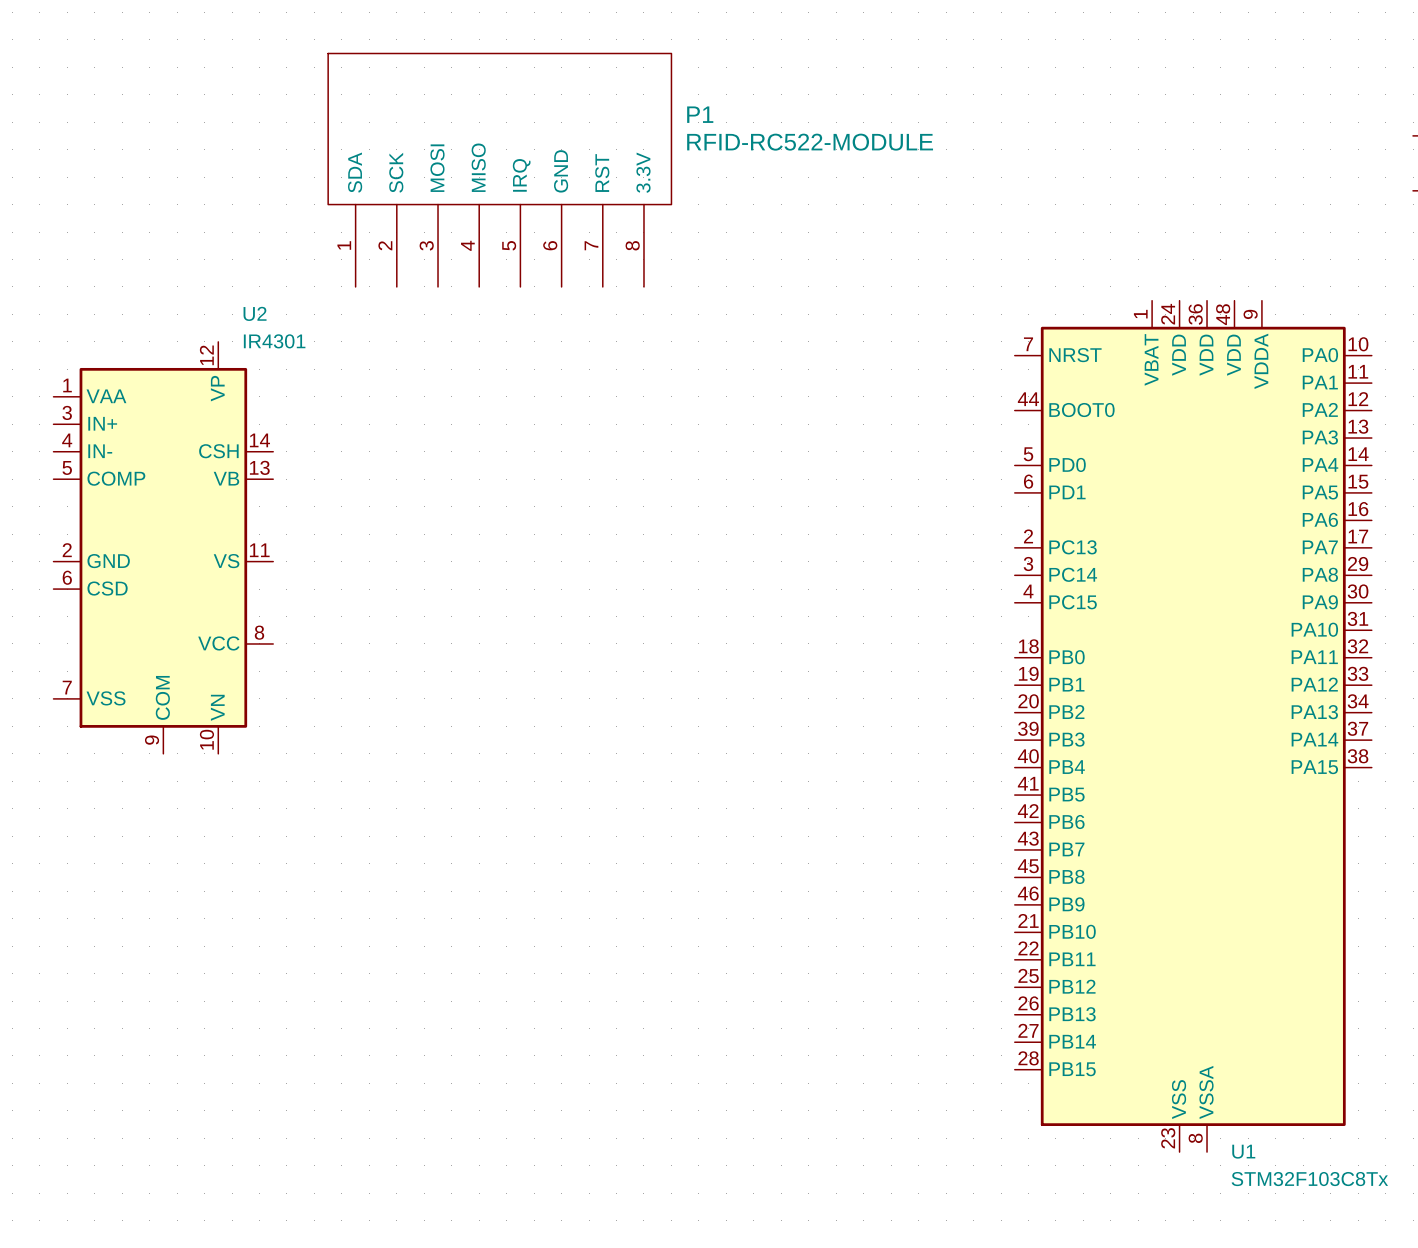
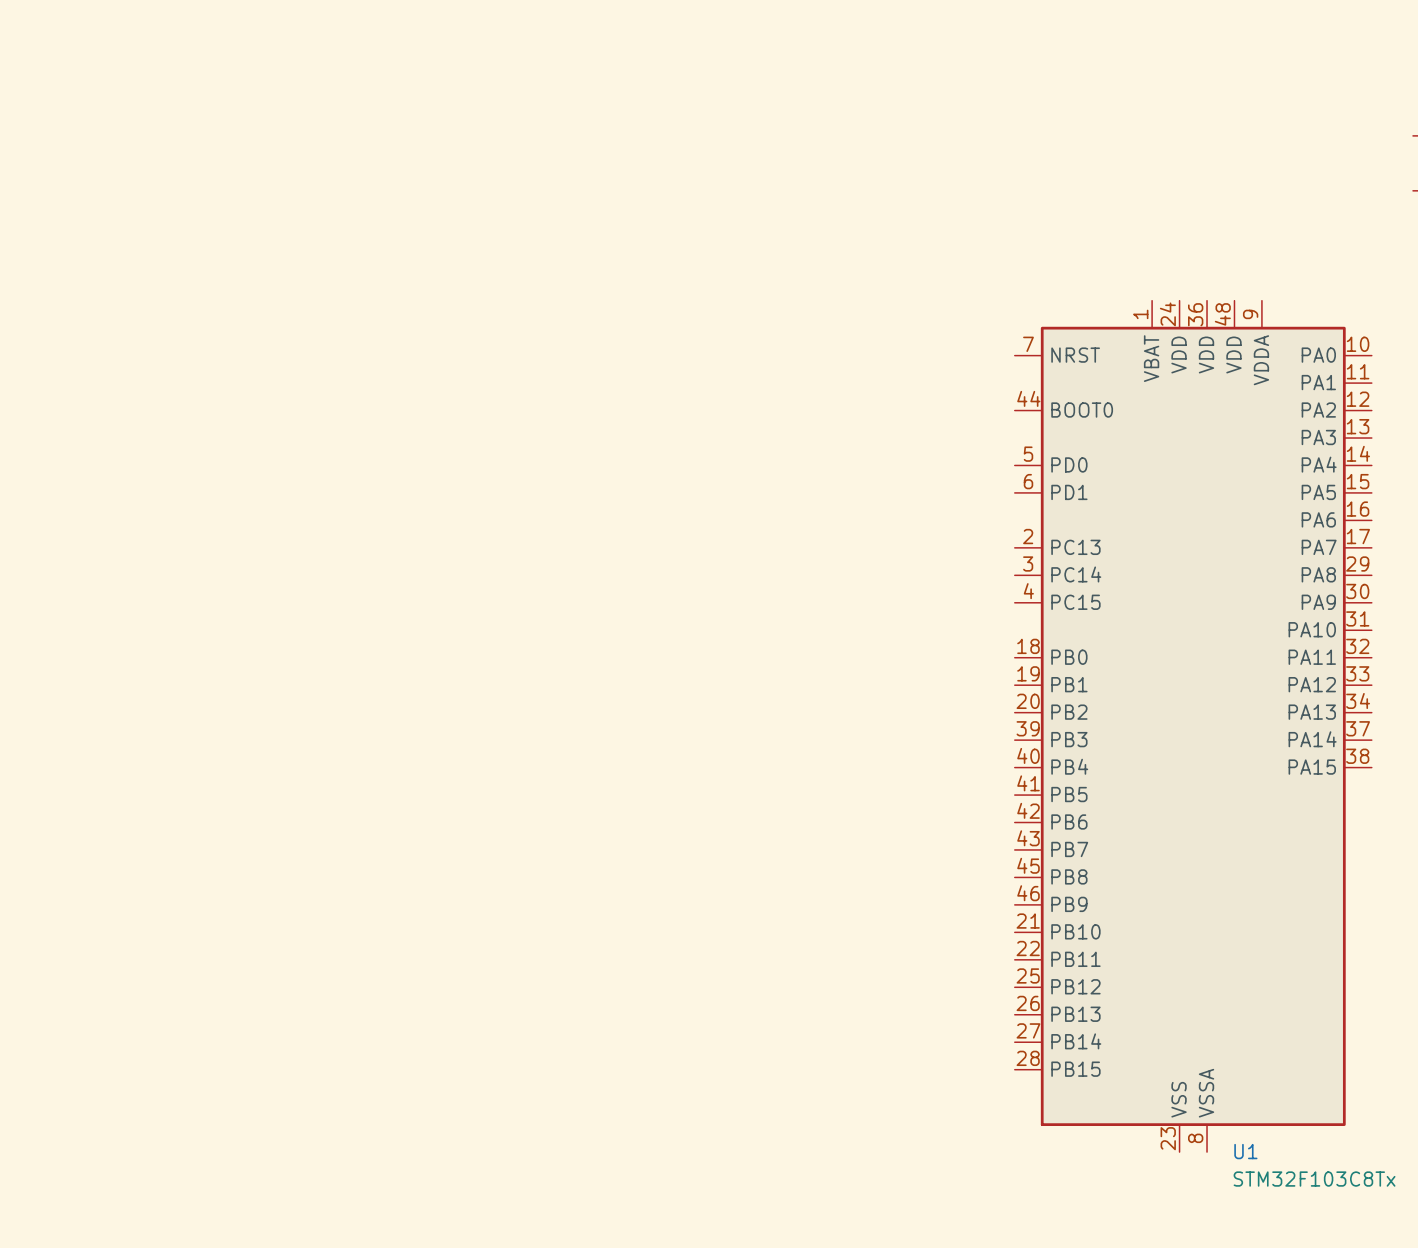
P1: RFID-RC522-MODULE (499, 170) -> none
U2: IR4301 (163, 547) -> none

